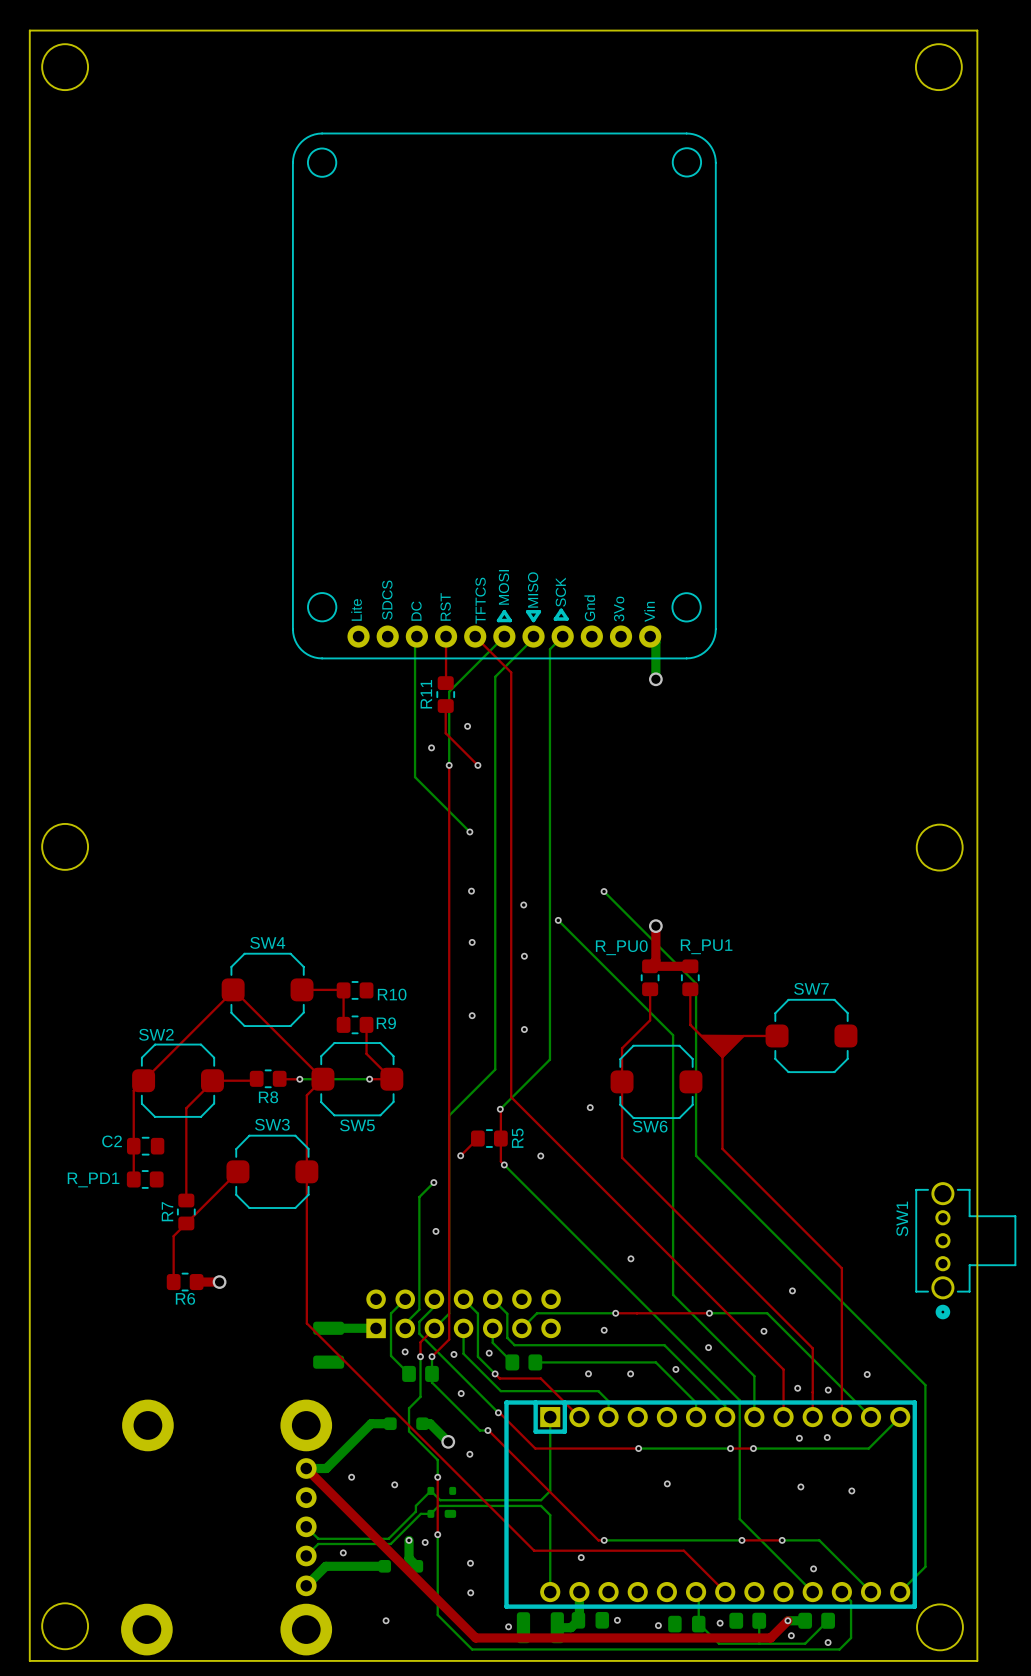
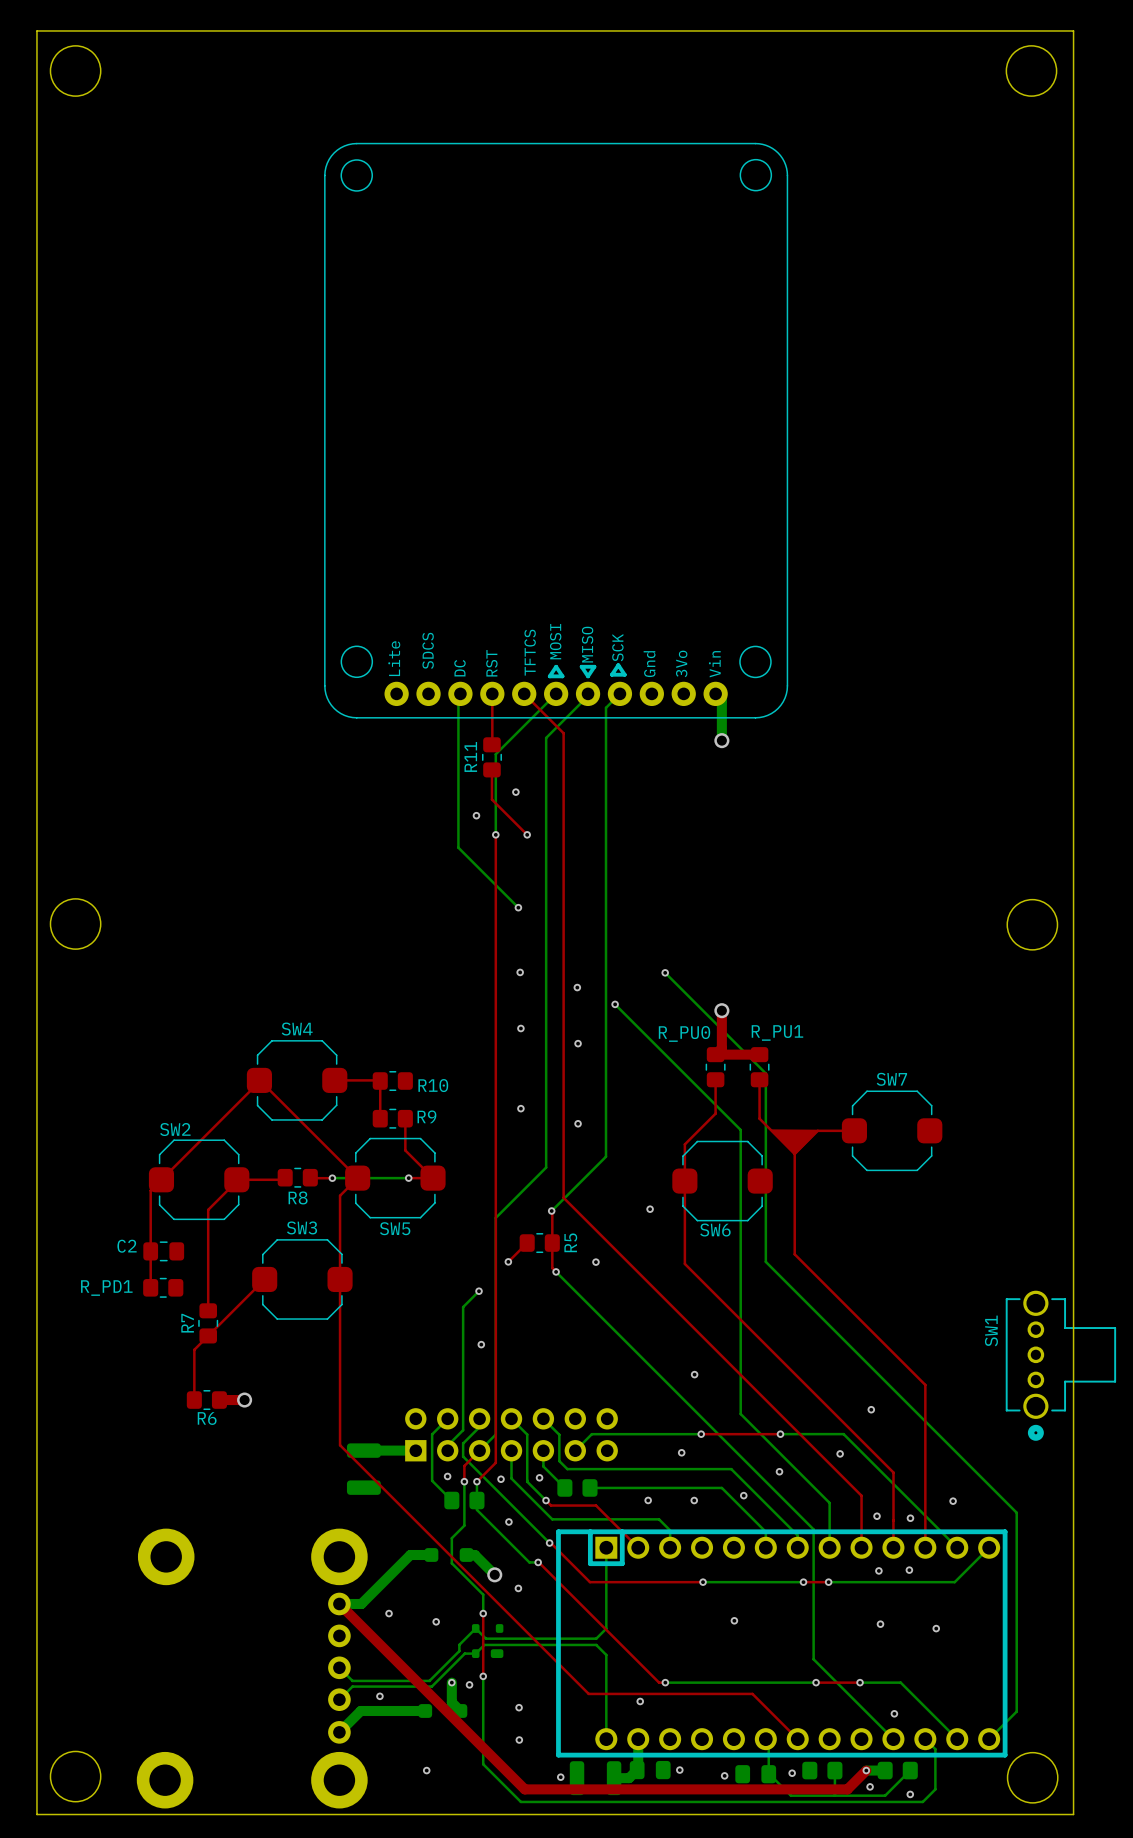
bottom track: none -> (677, 1434) (701, 1434)
via: (615, 1313) -> none
via: none -> (701, 1434)
via: (604, 1330) -> none
via: none -> (681, 1452)

